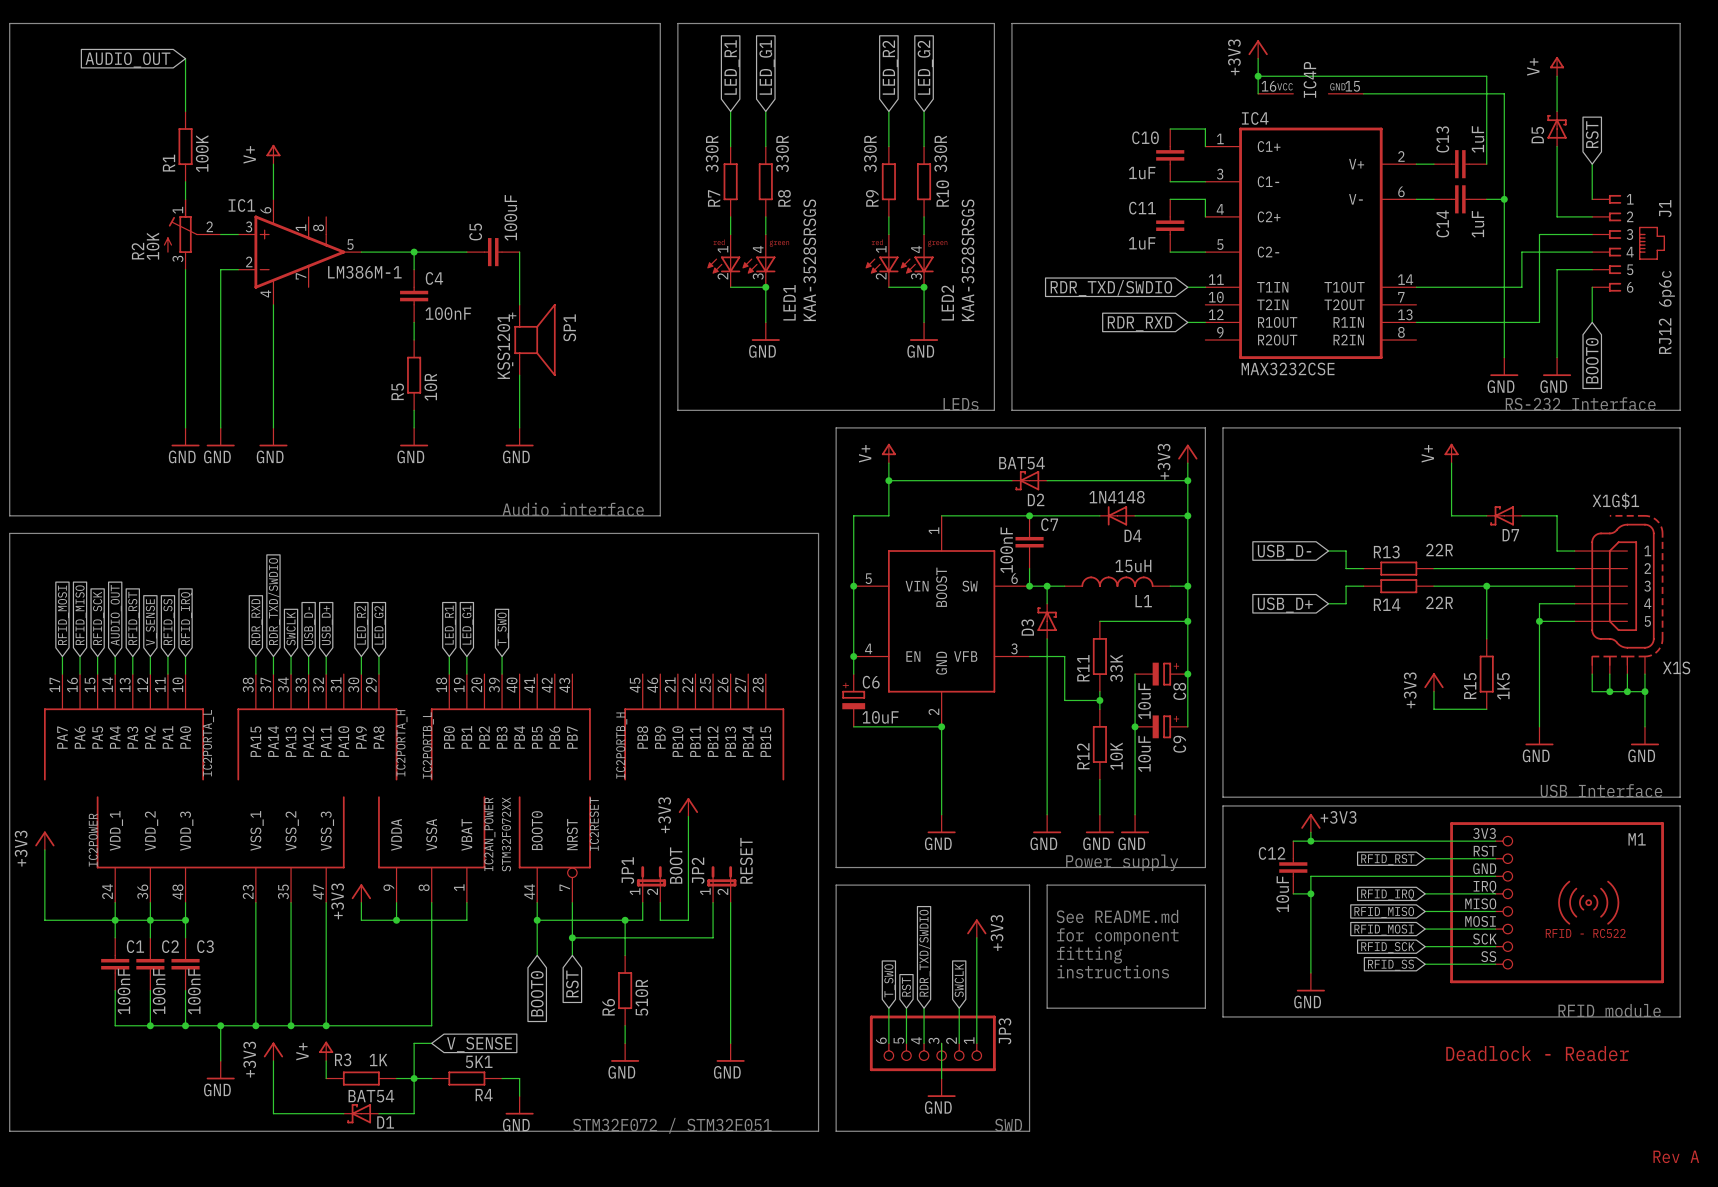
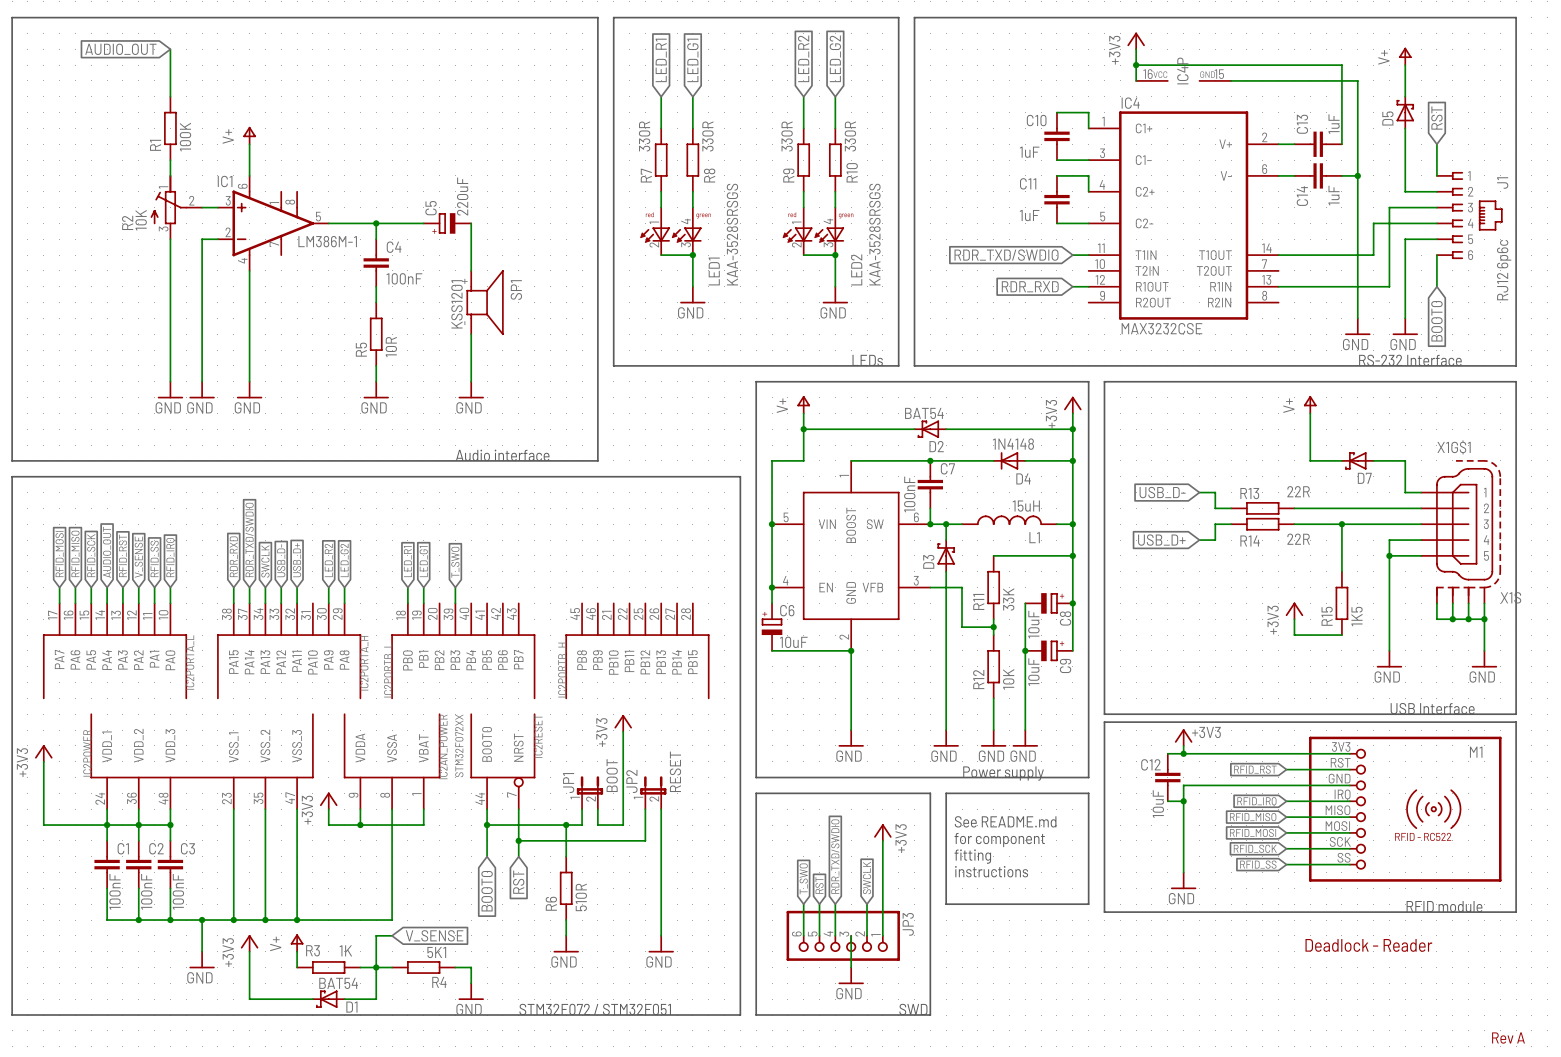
C5 value: 100uF (510, 217) -> 220uF (462, 196)
C5 symbol: [466, 238, 520, 267] -> [423, 213, 472, 234]

